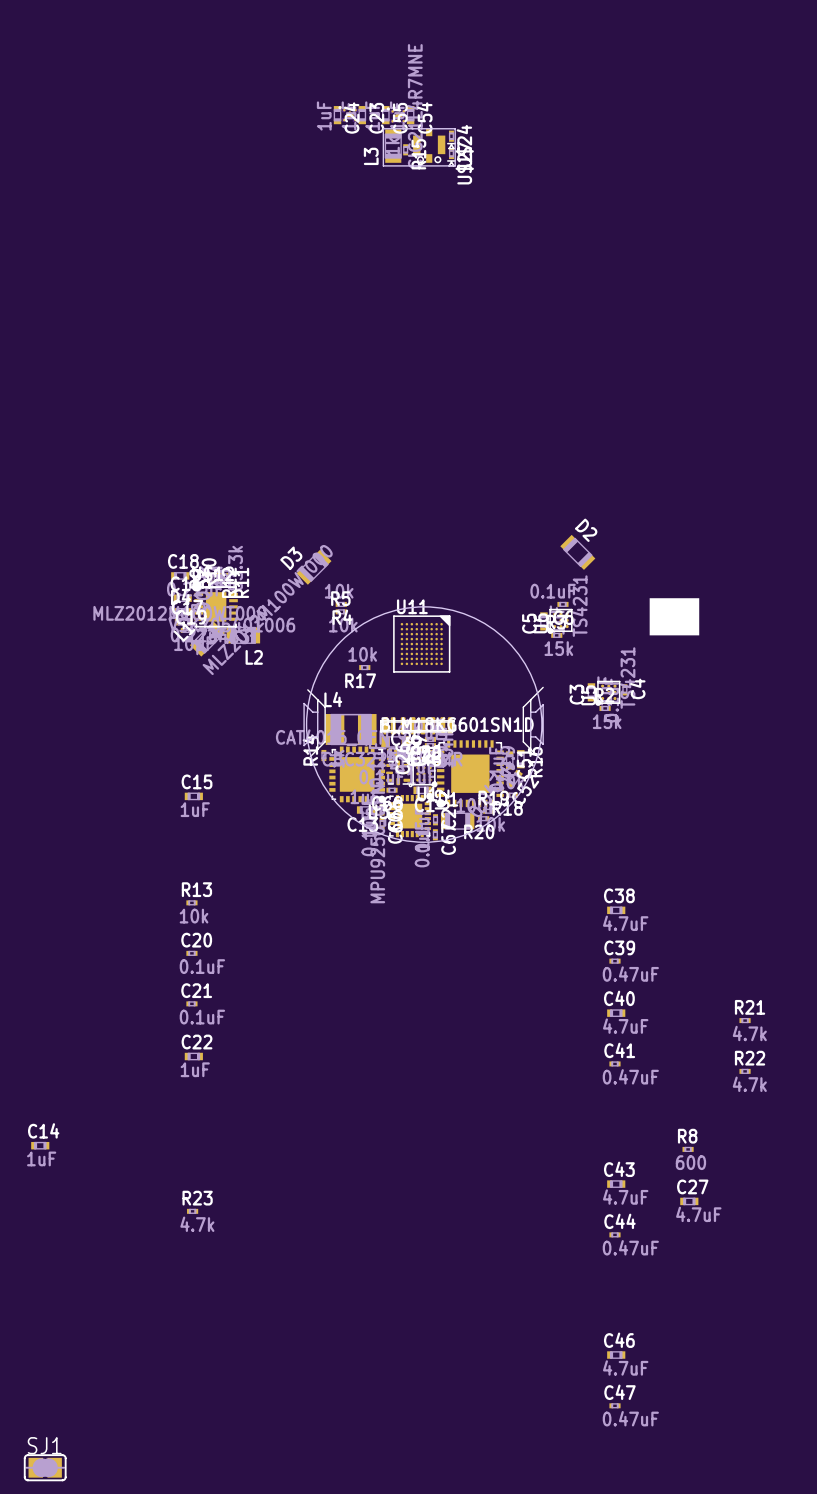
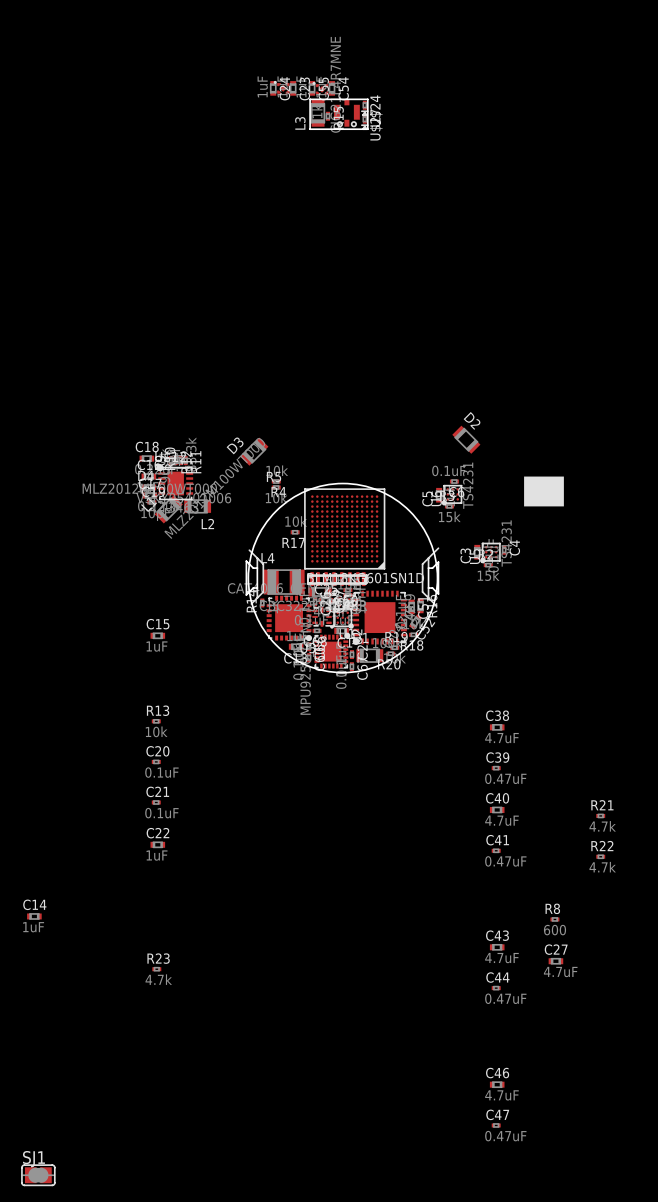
U11: (421, 644) -> none
part: none -> (344, 528)

